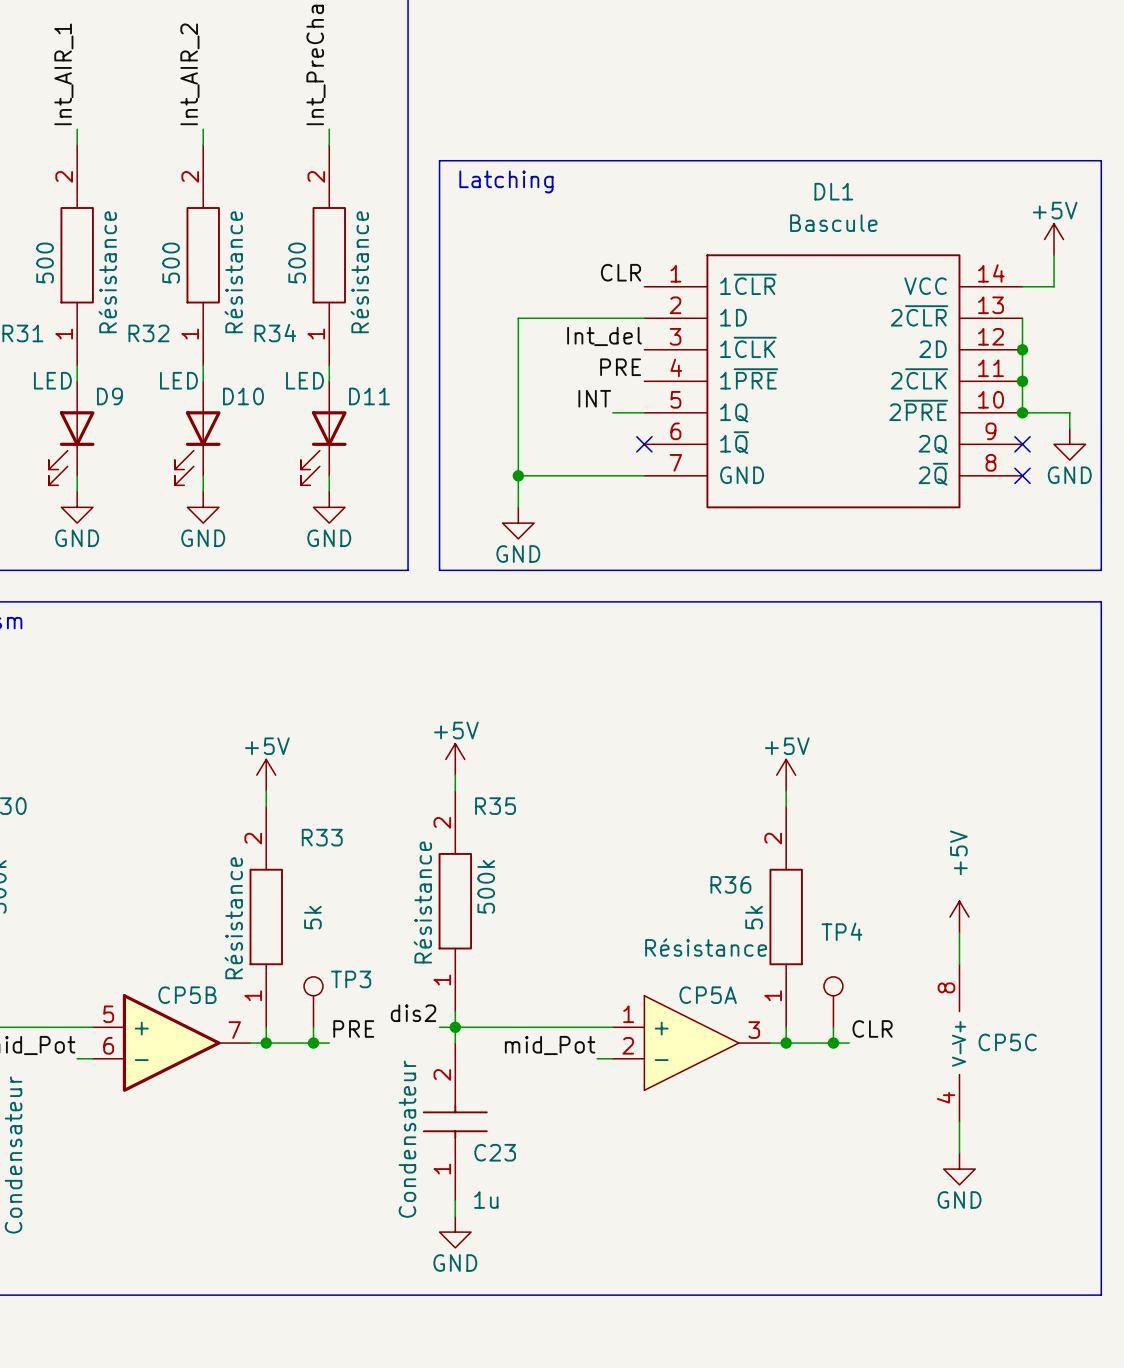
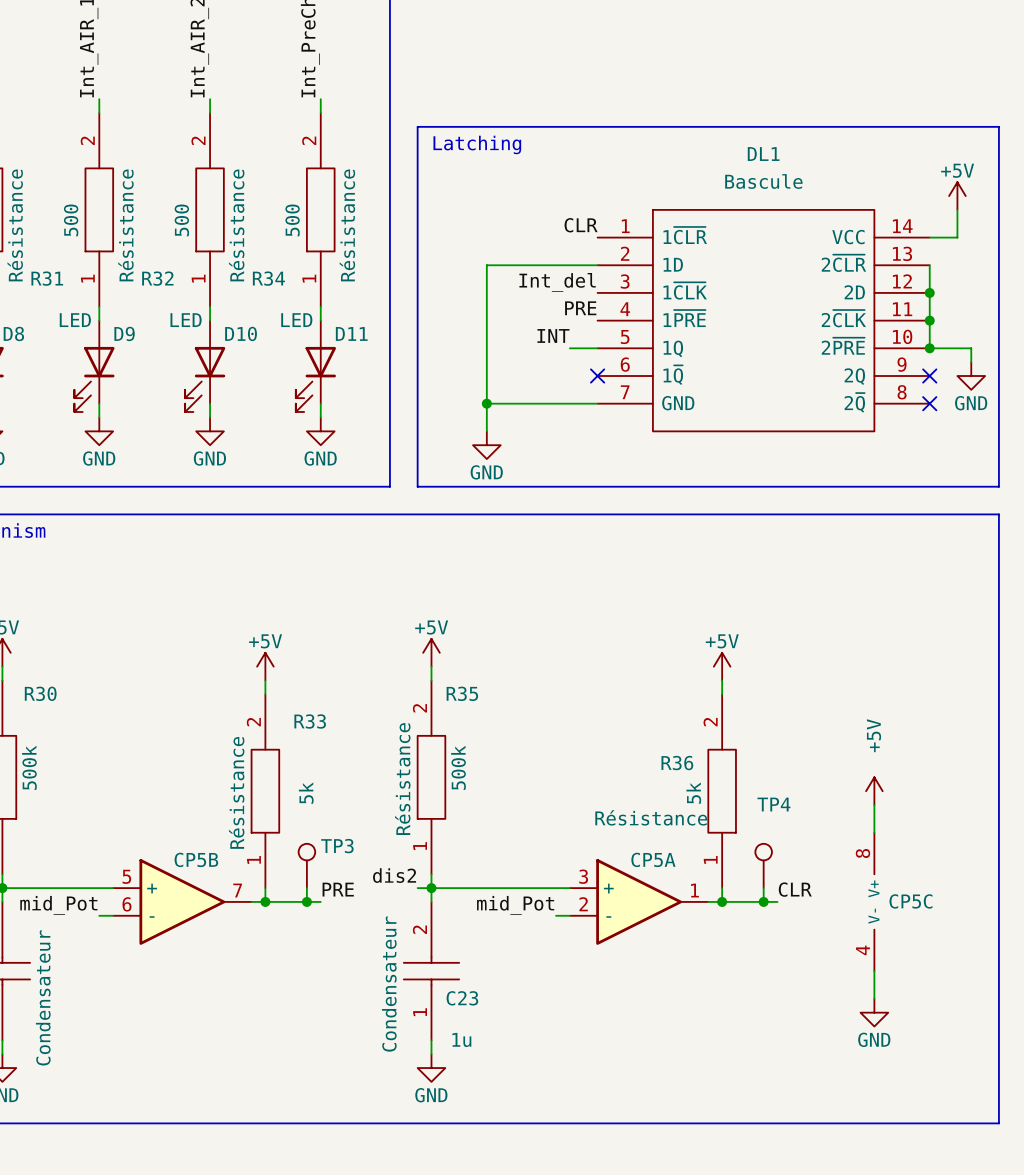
CP5A symbol: [612, 995, 771, 1091] -> [569, 859, 709, 945]

